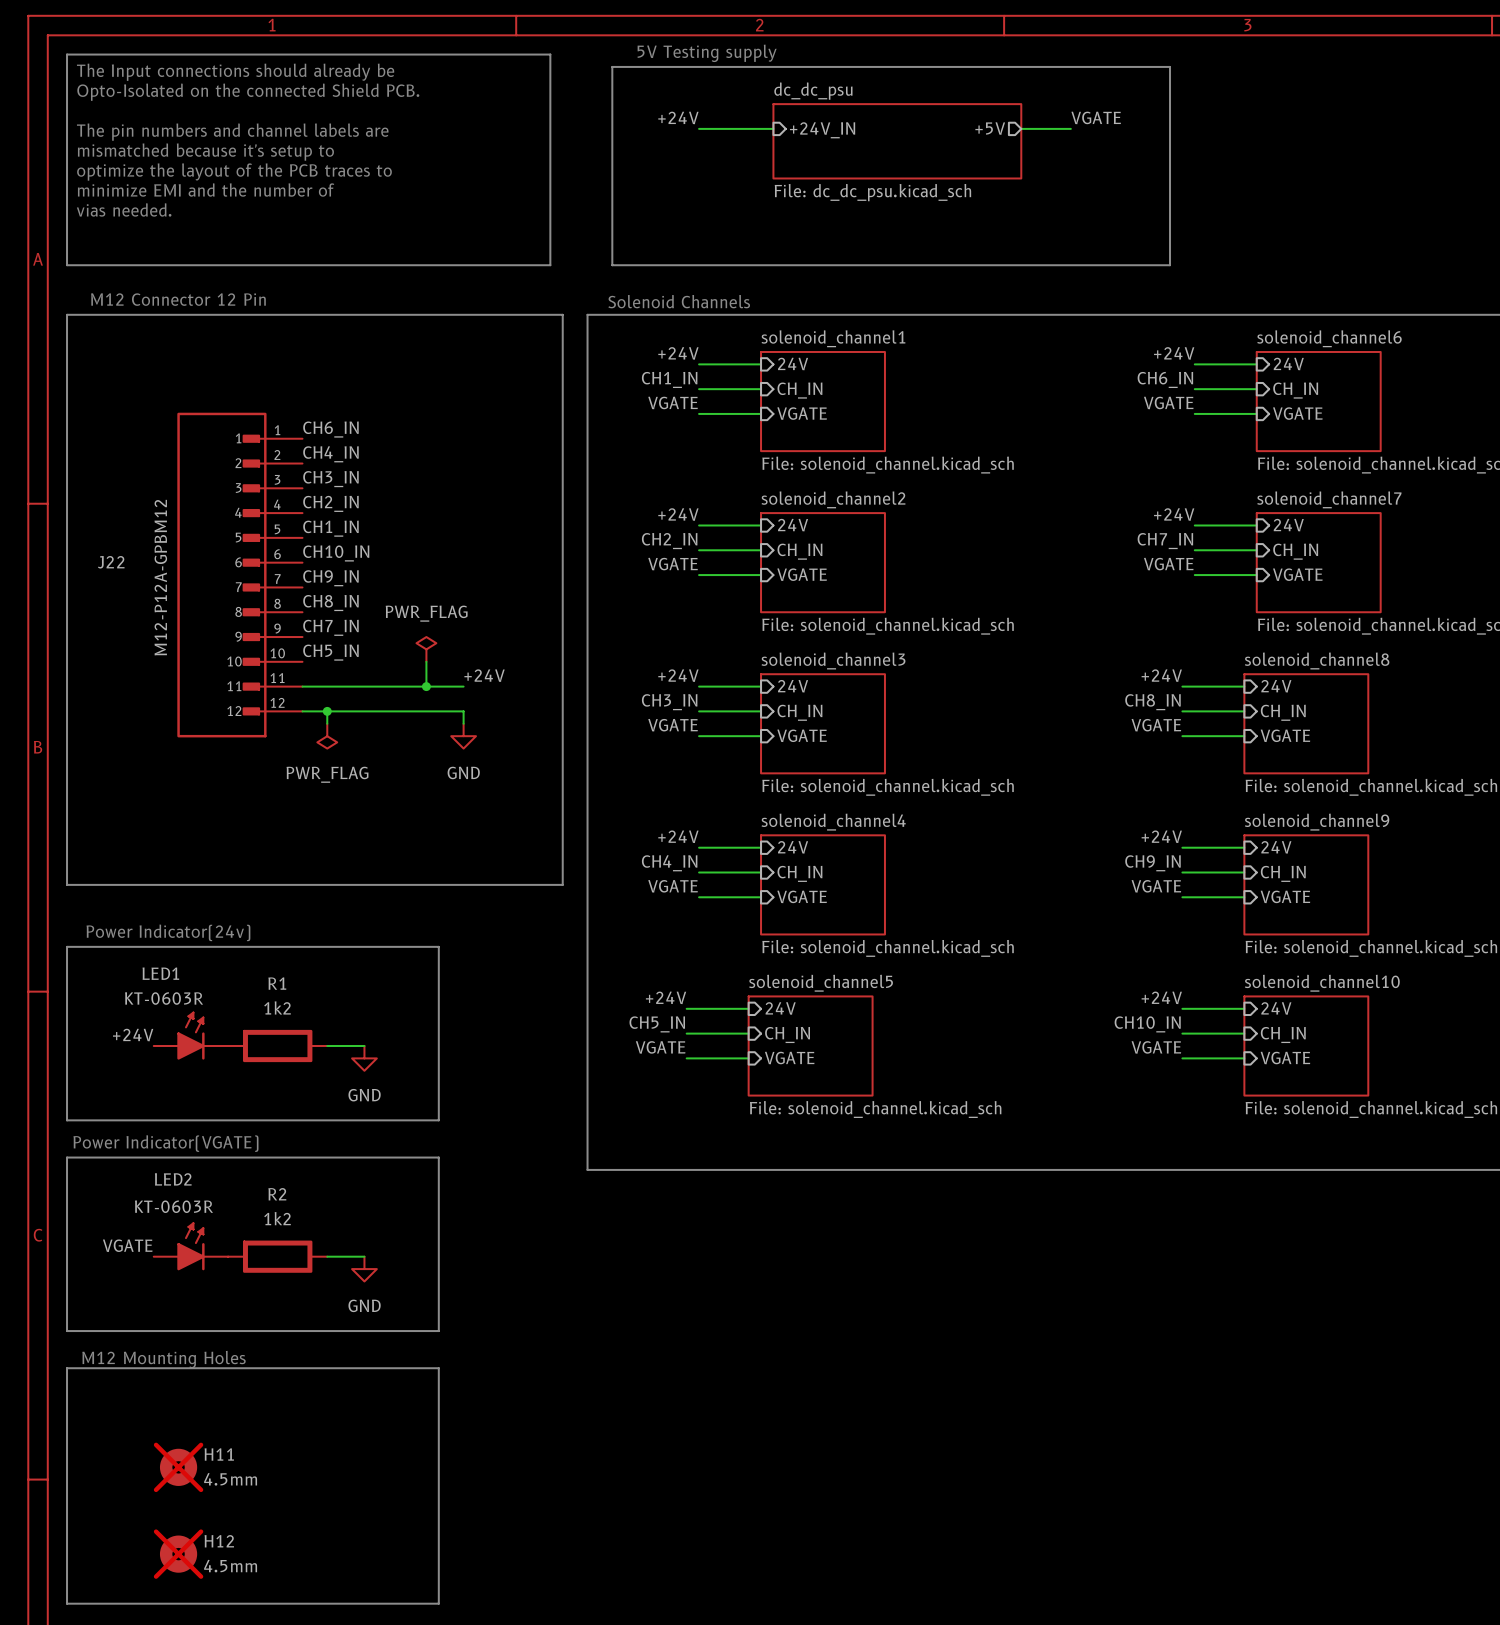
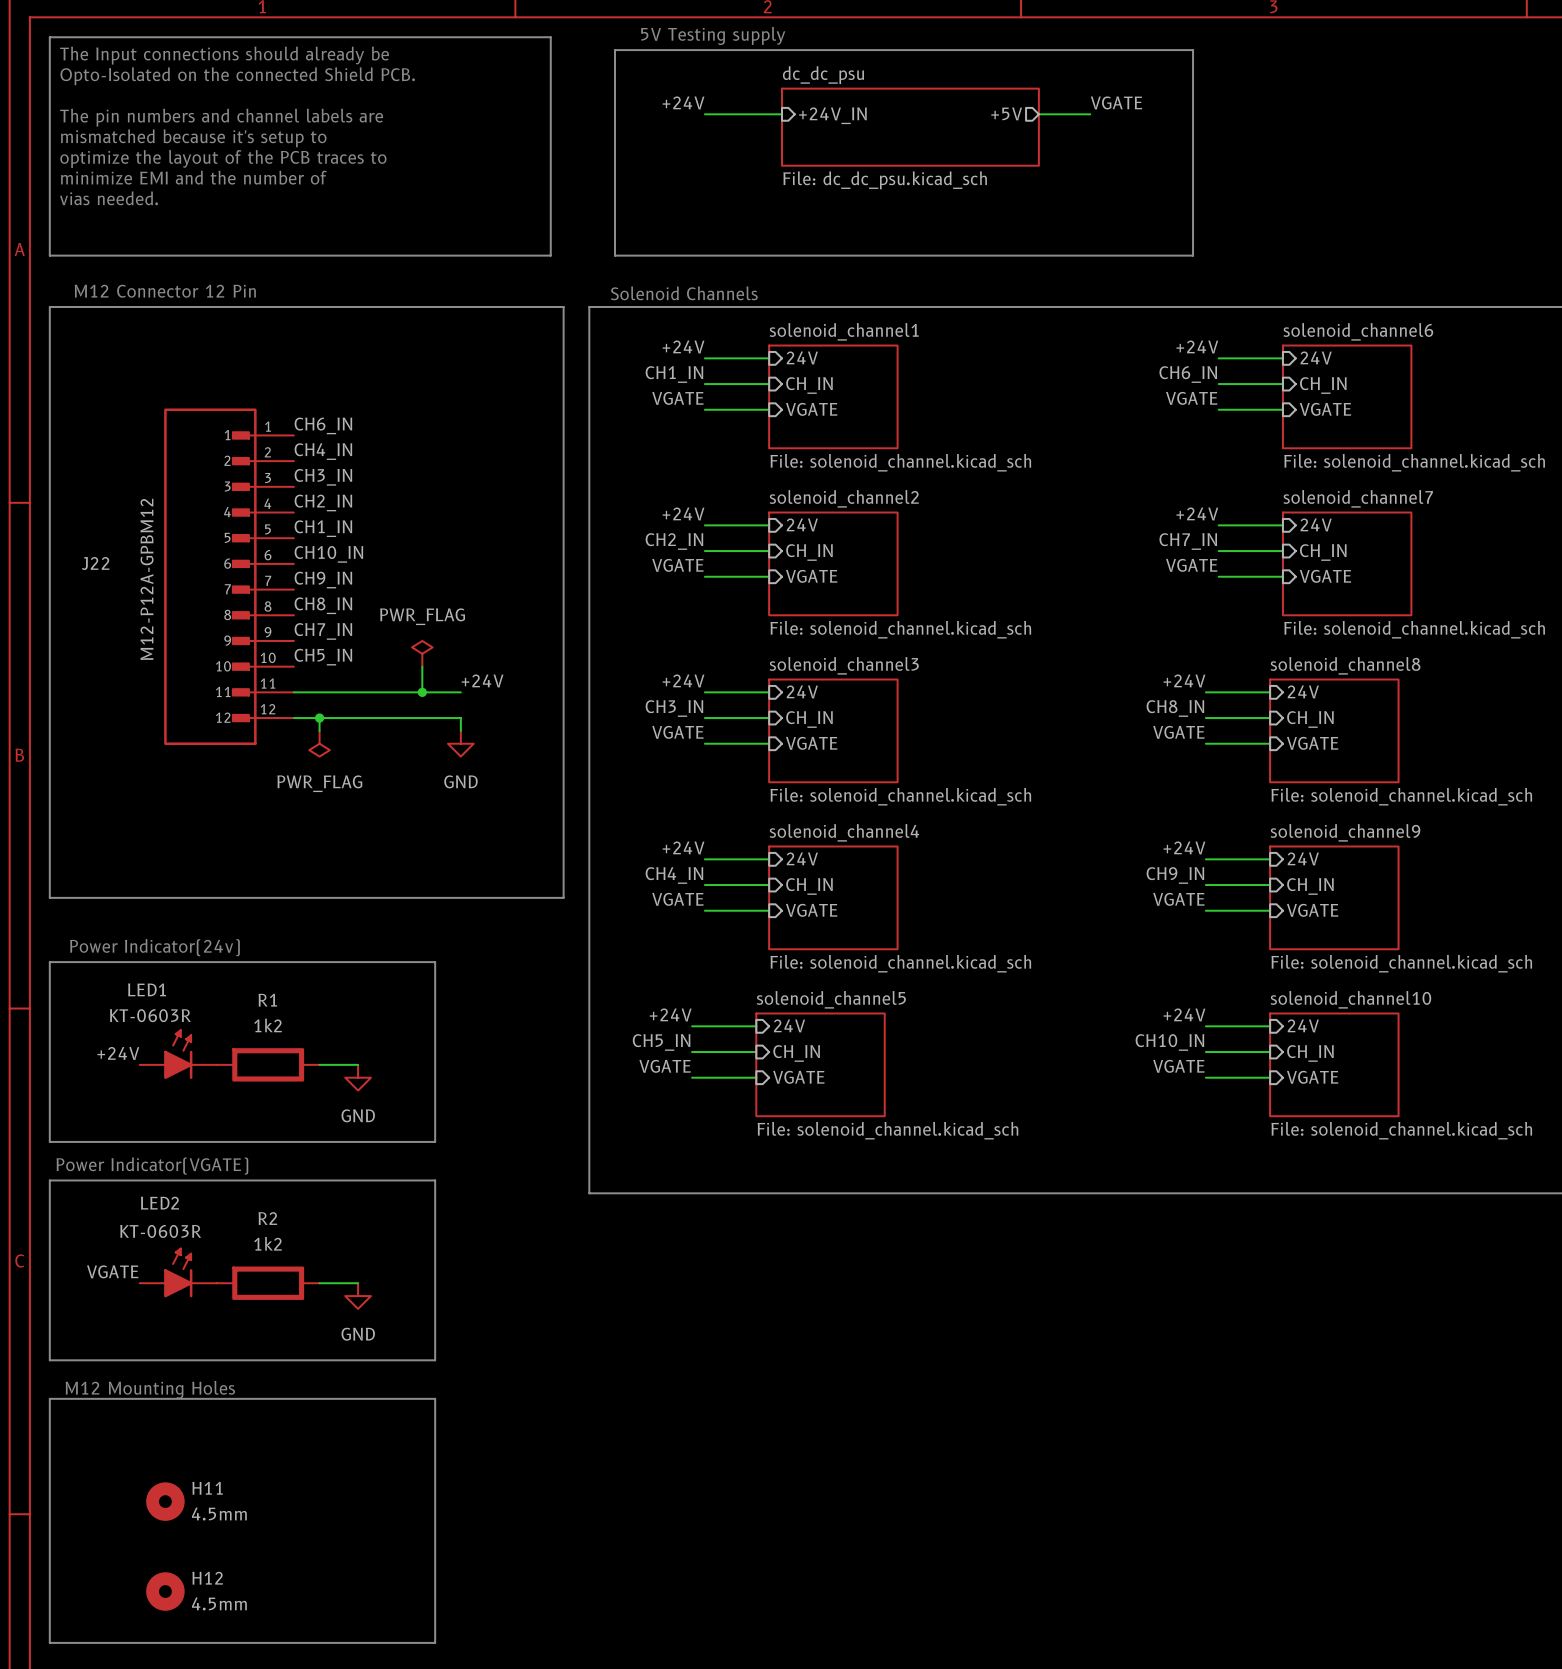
H11 do-not-place cross: (178, 1467) -> none
H12 do-not-place cross: (178, 1554) -> none

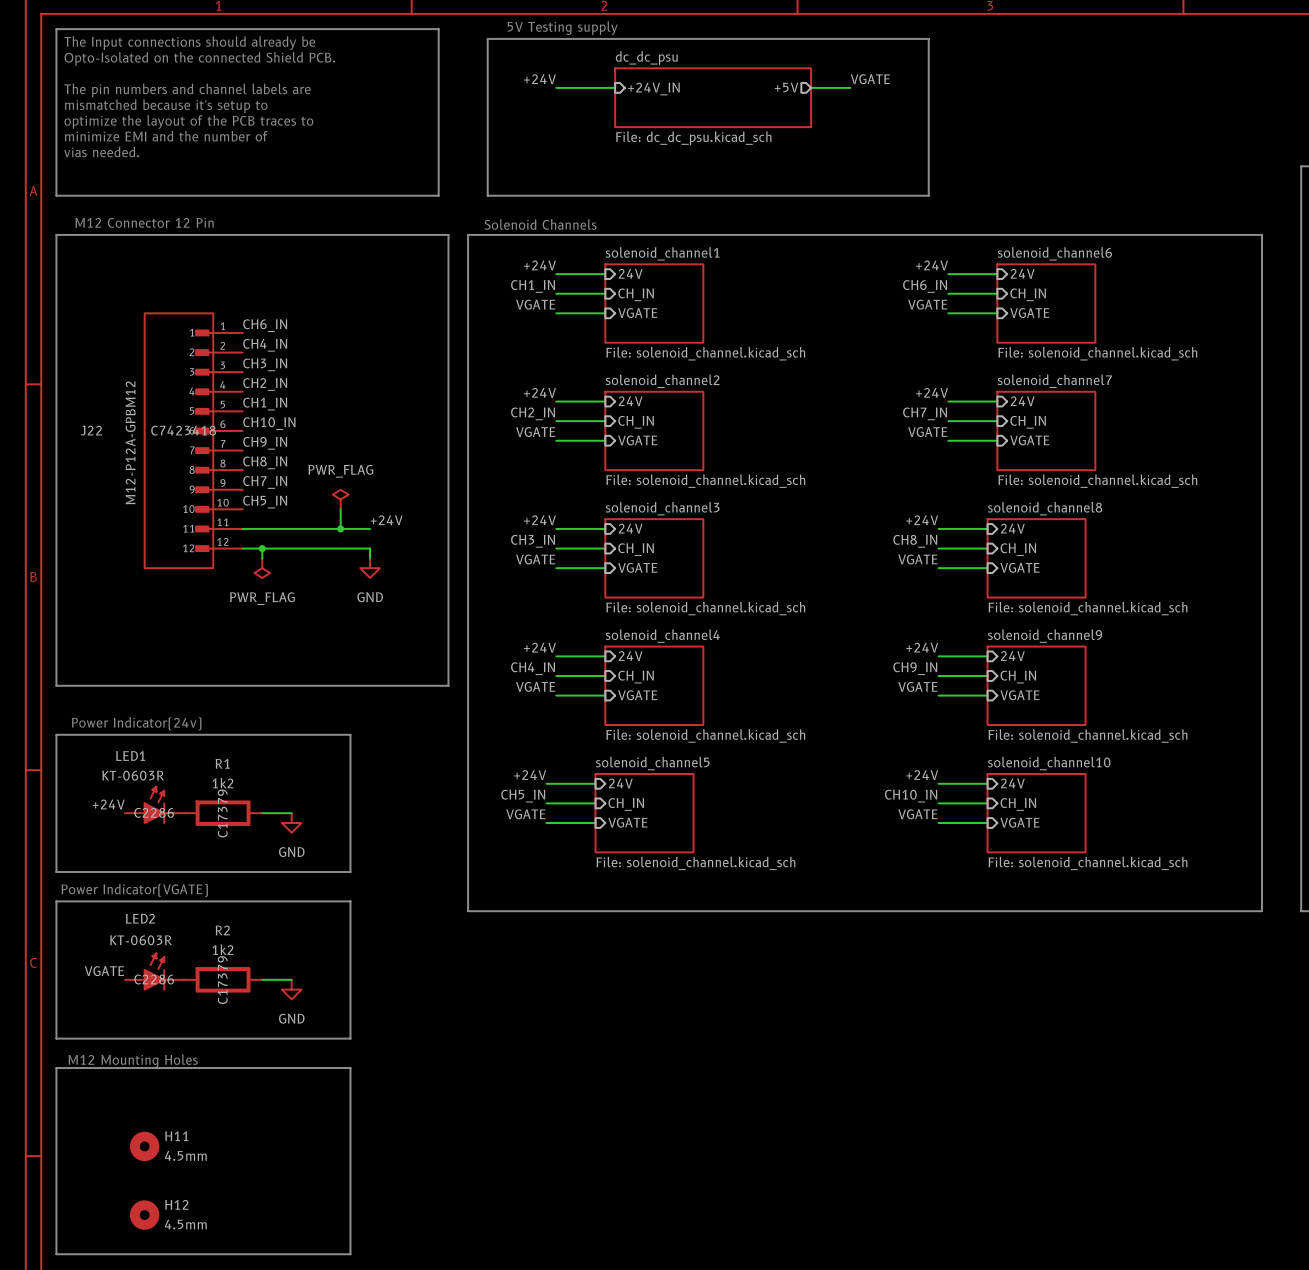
J22 text: none -> C7423418 (183, 430)
LED1 text: none -> C2286 (154, 812)
R1 text: none -> C17379 (222, 813)
LED2 text: none -> C2286 (154, 979)
R2 text: none -> C17379 (222, 980)

